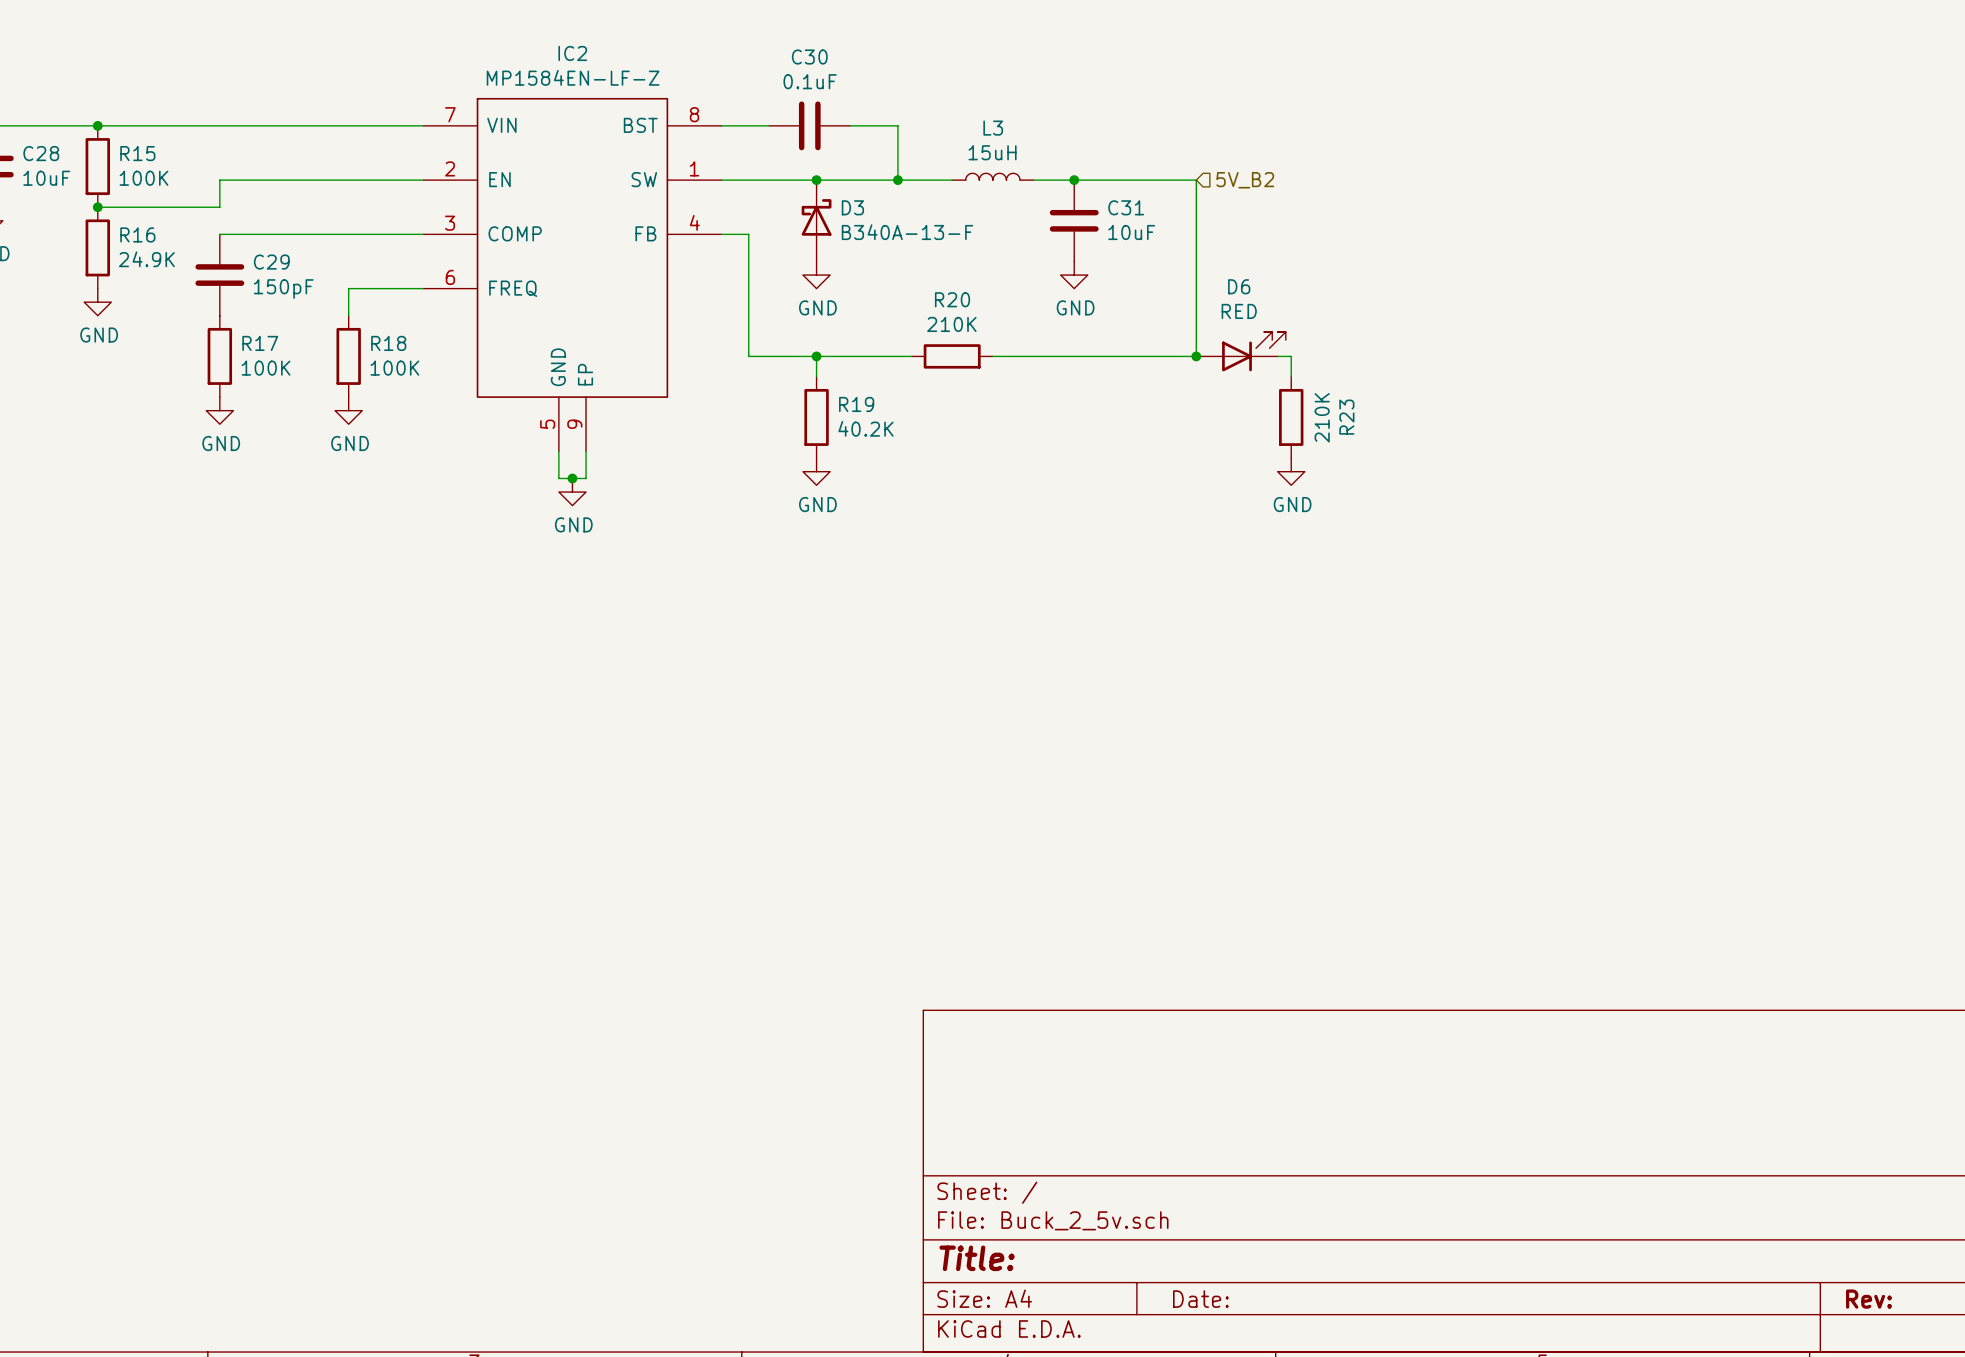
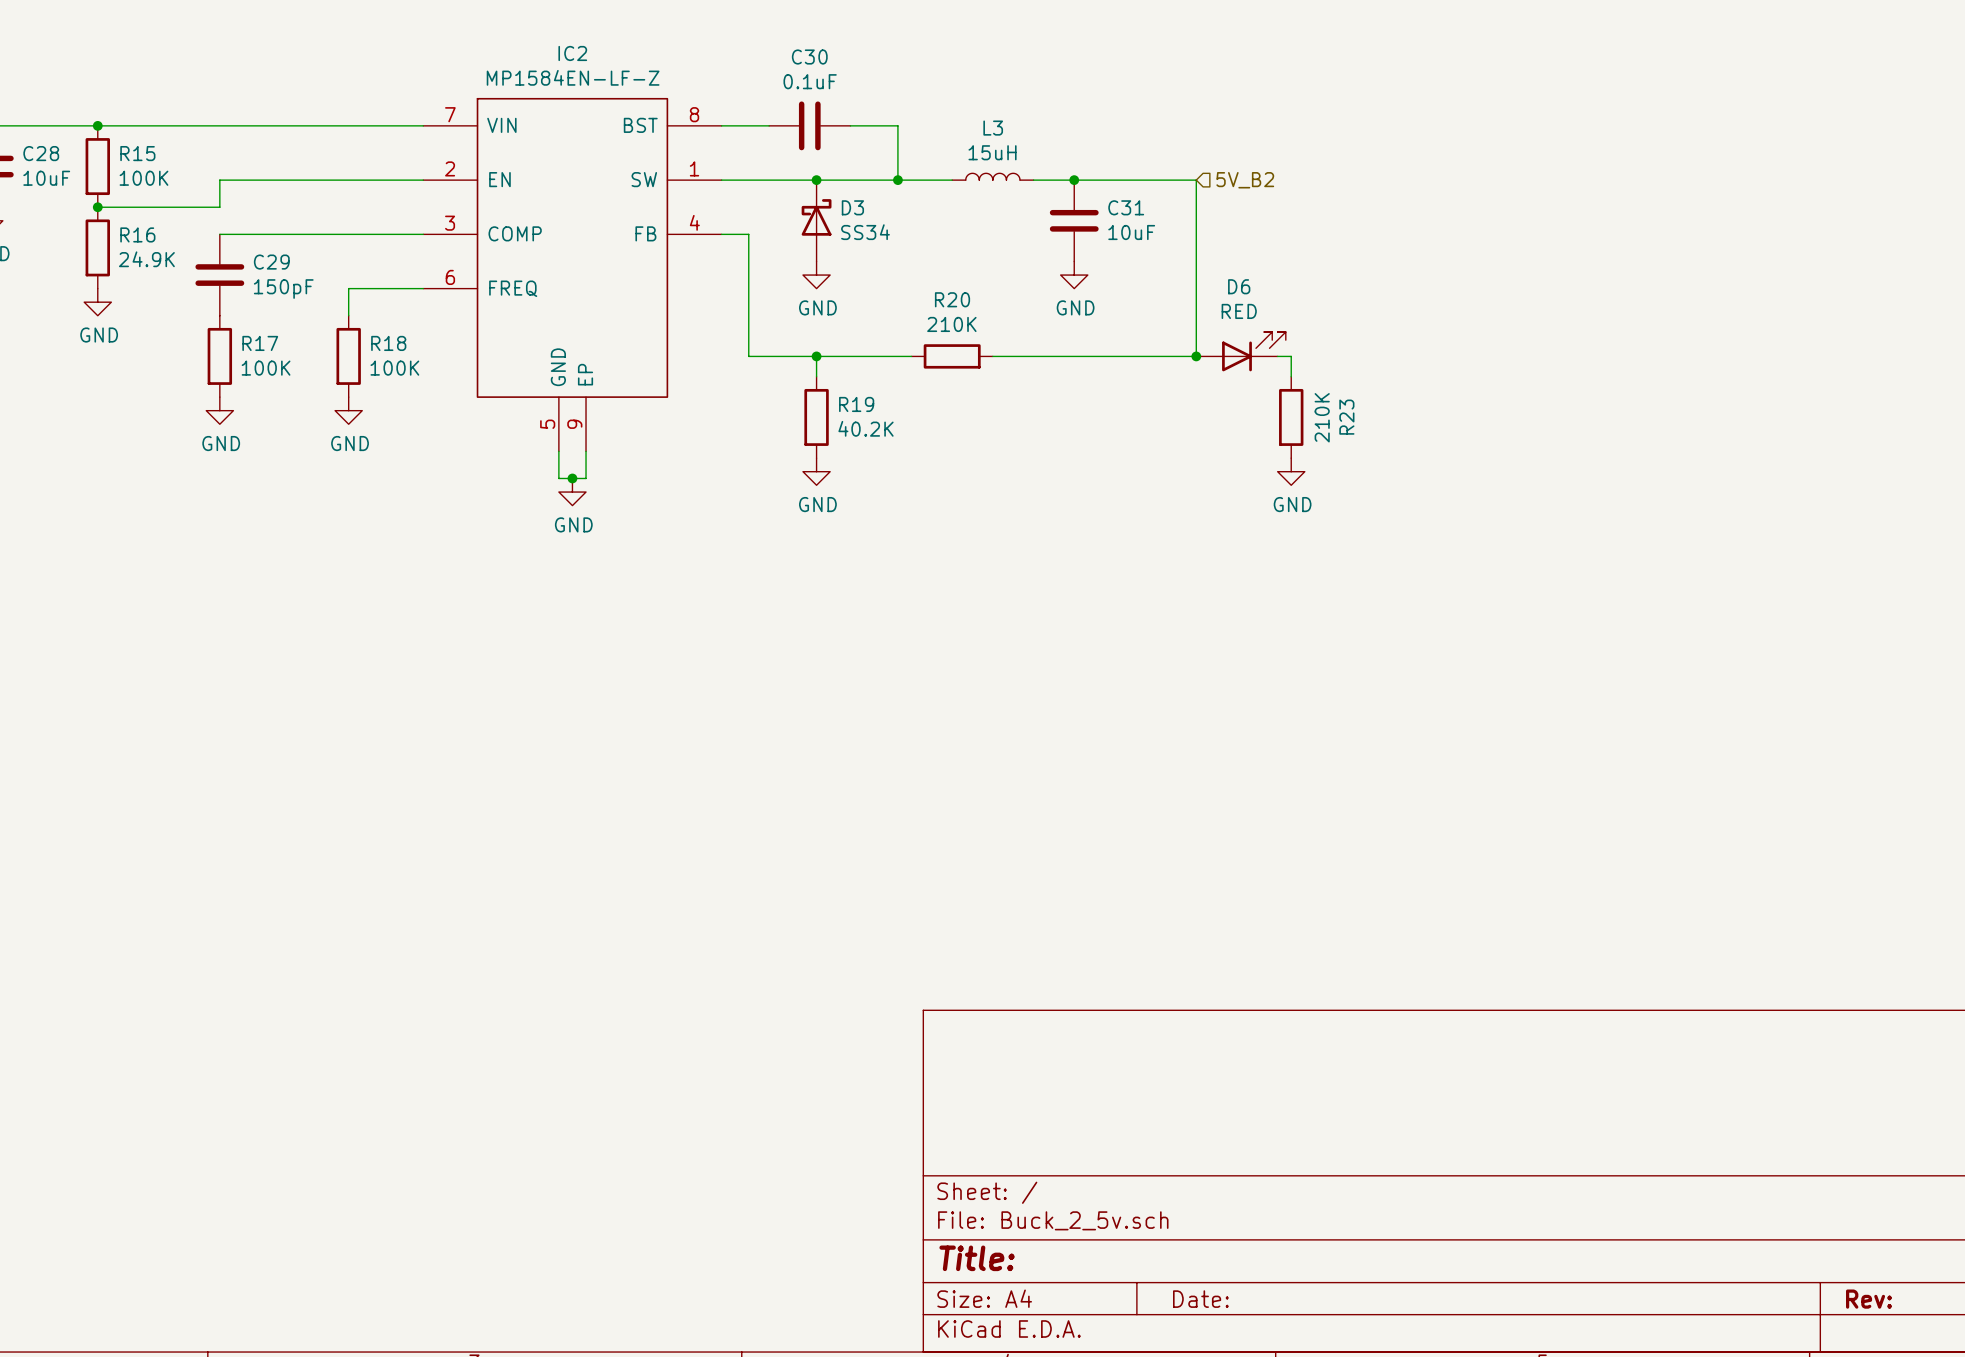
D3 value: B340A-13-F (907, 232) -> SS34 (865, 232)

